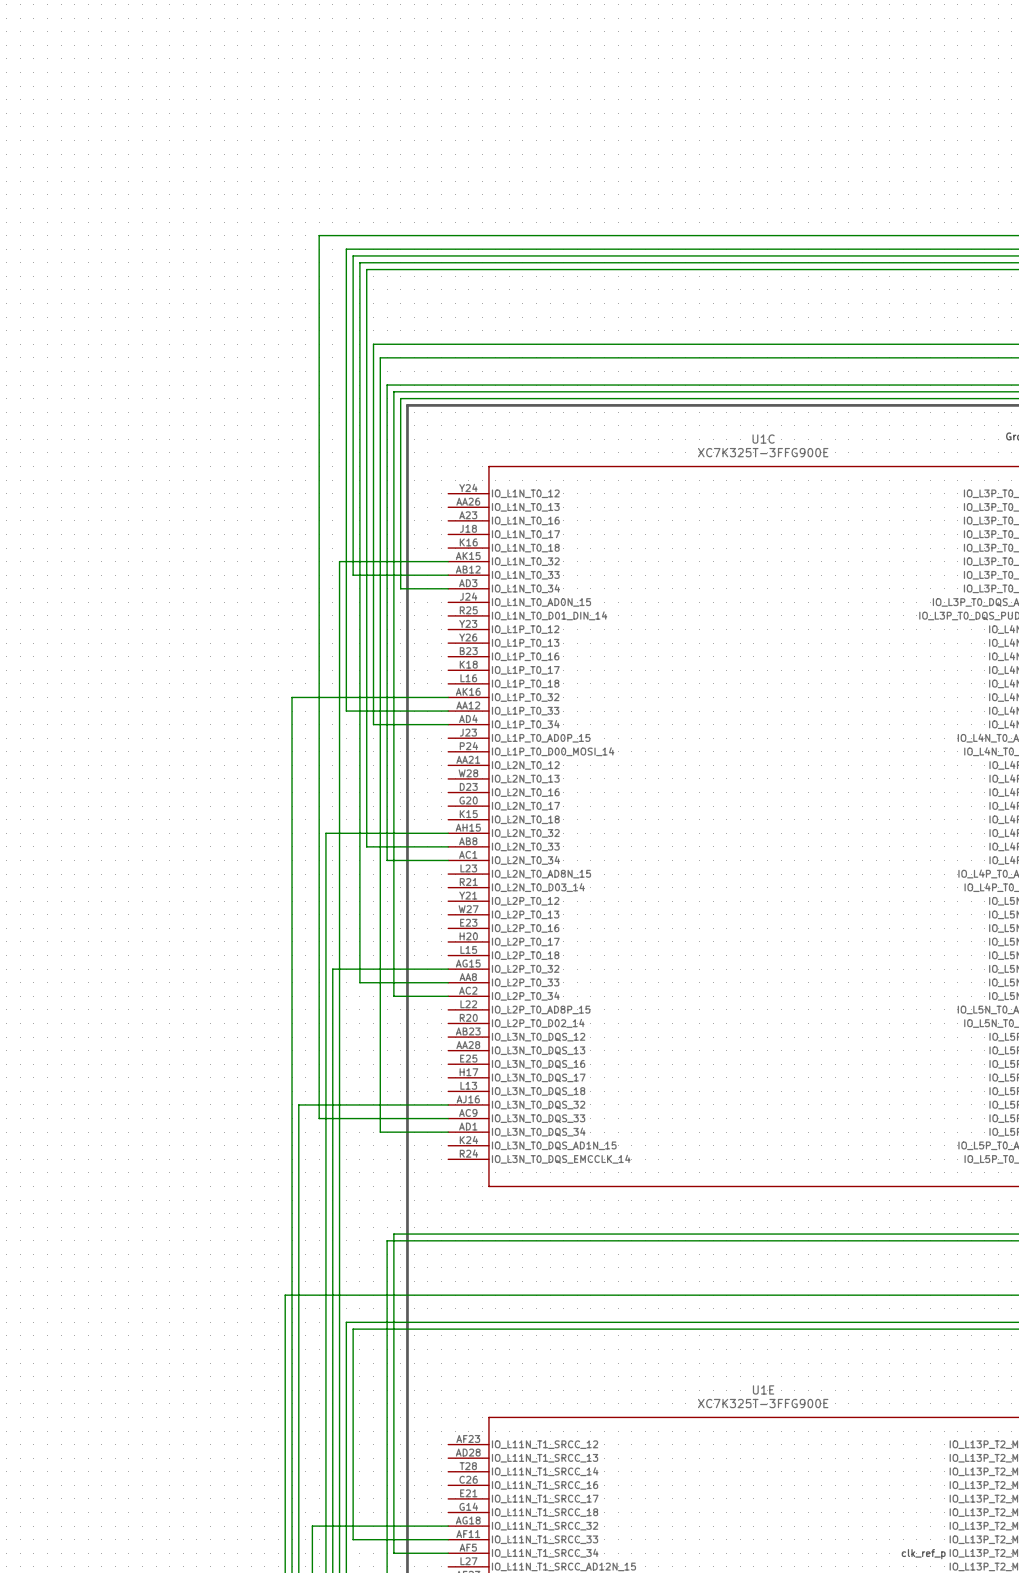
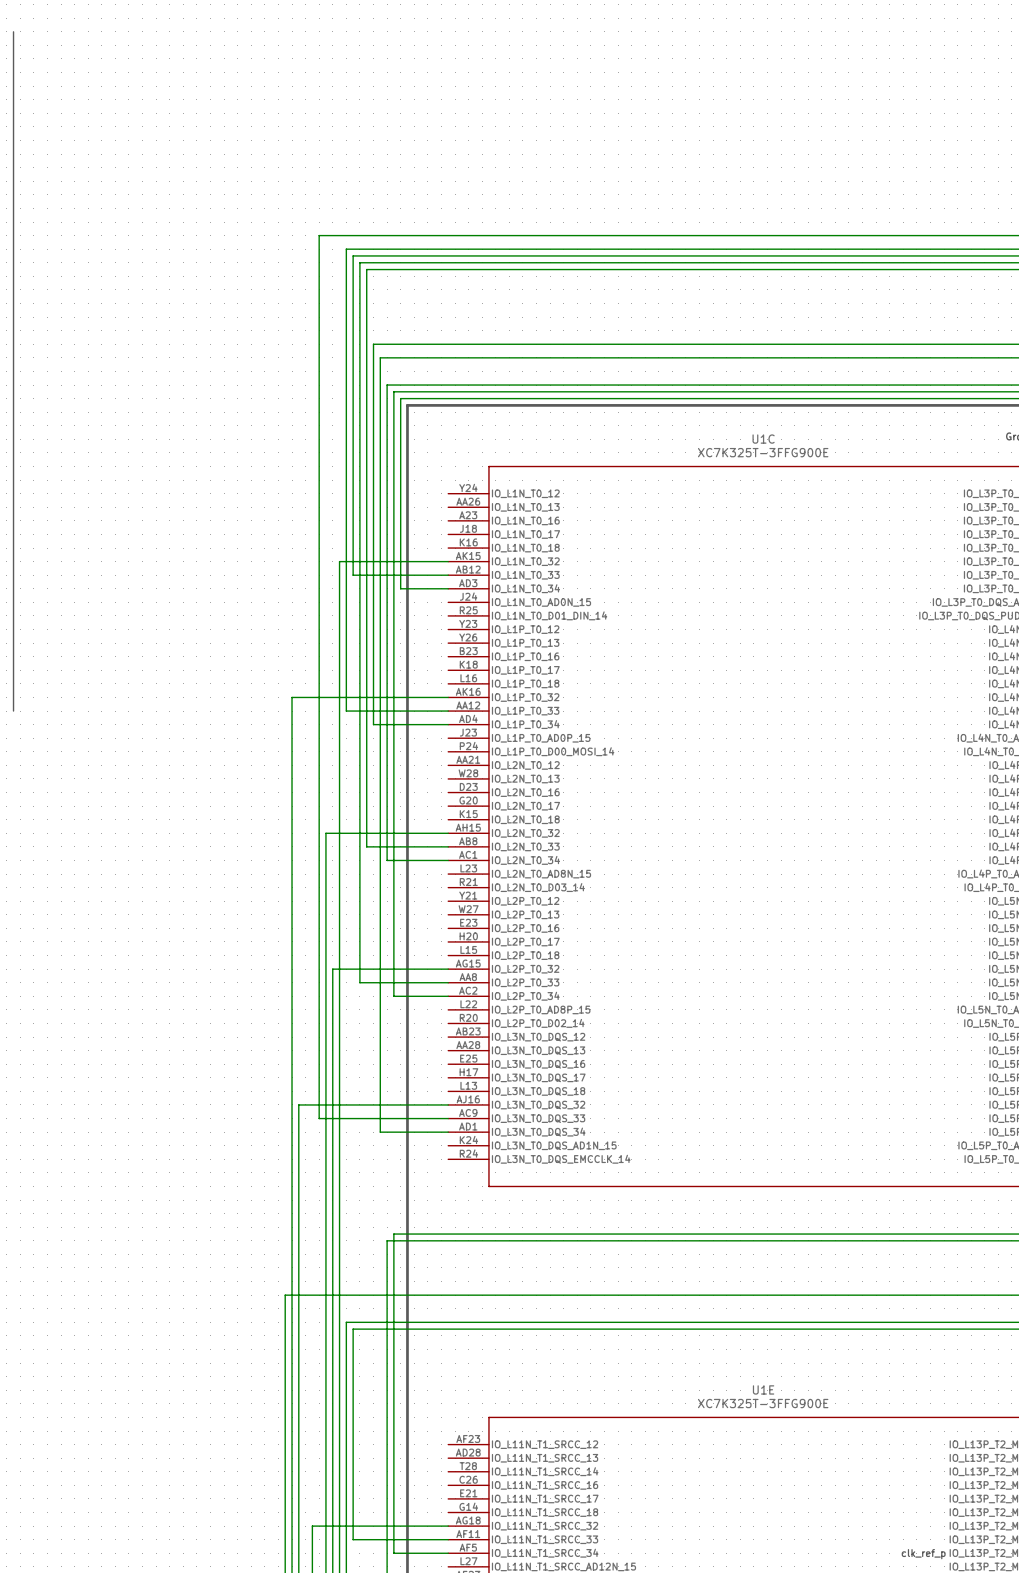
line: none -> (13, 31) (13, 711)

